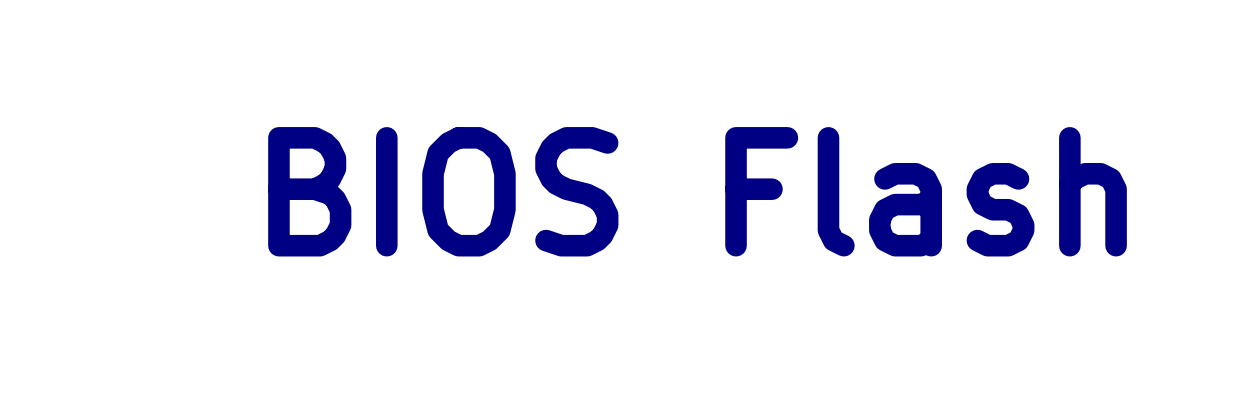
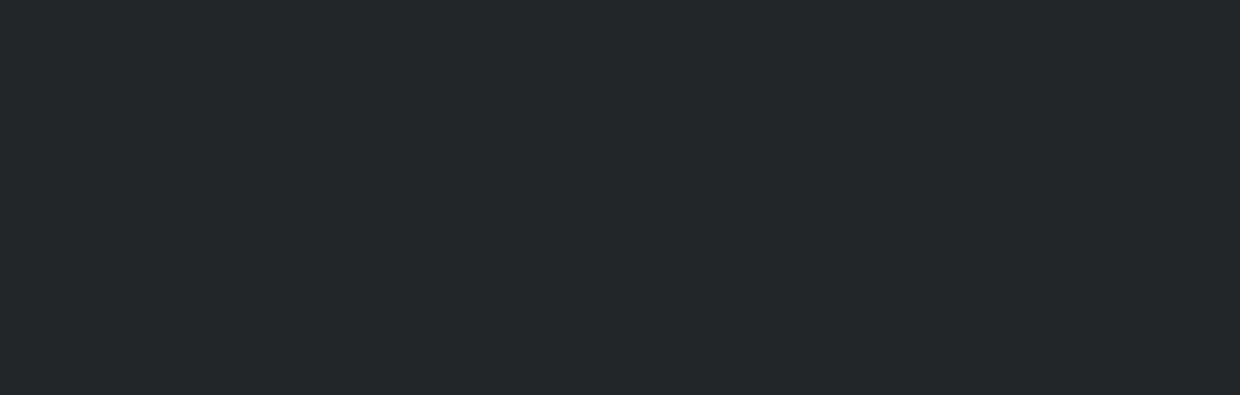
text: BIOS Flash (697, 191) -> none

